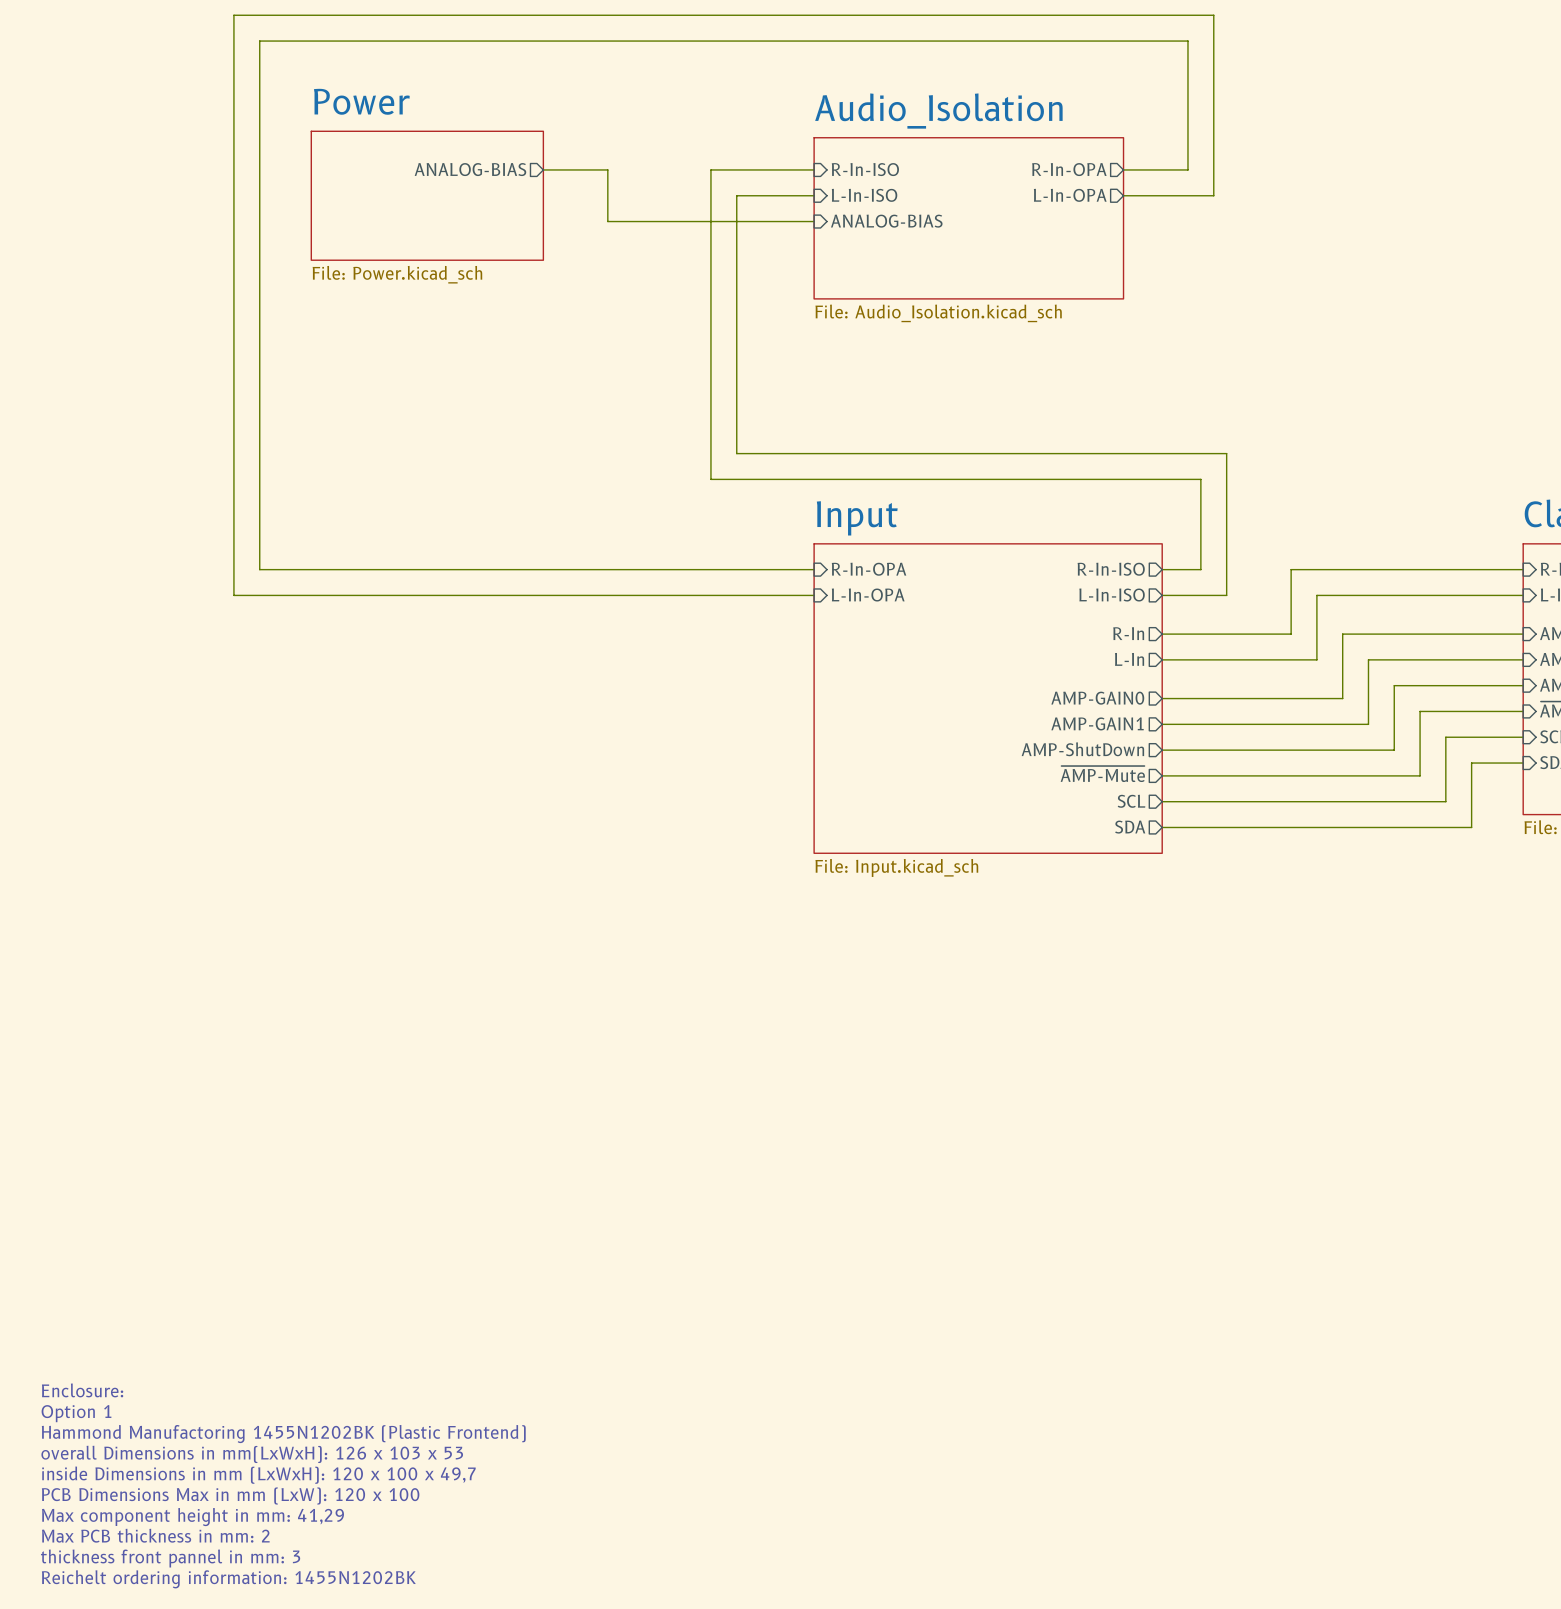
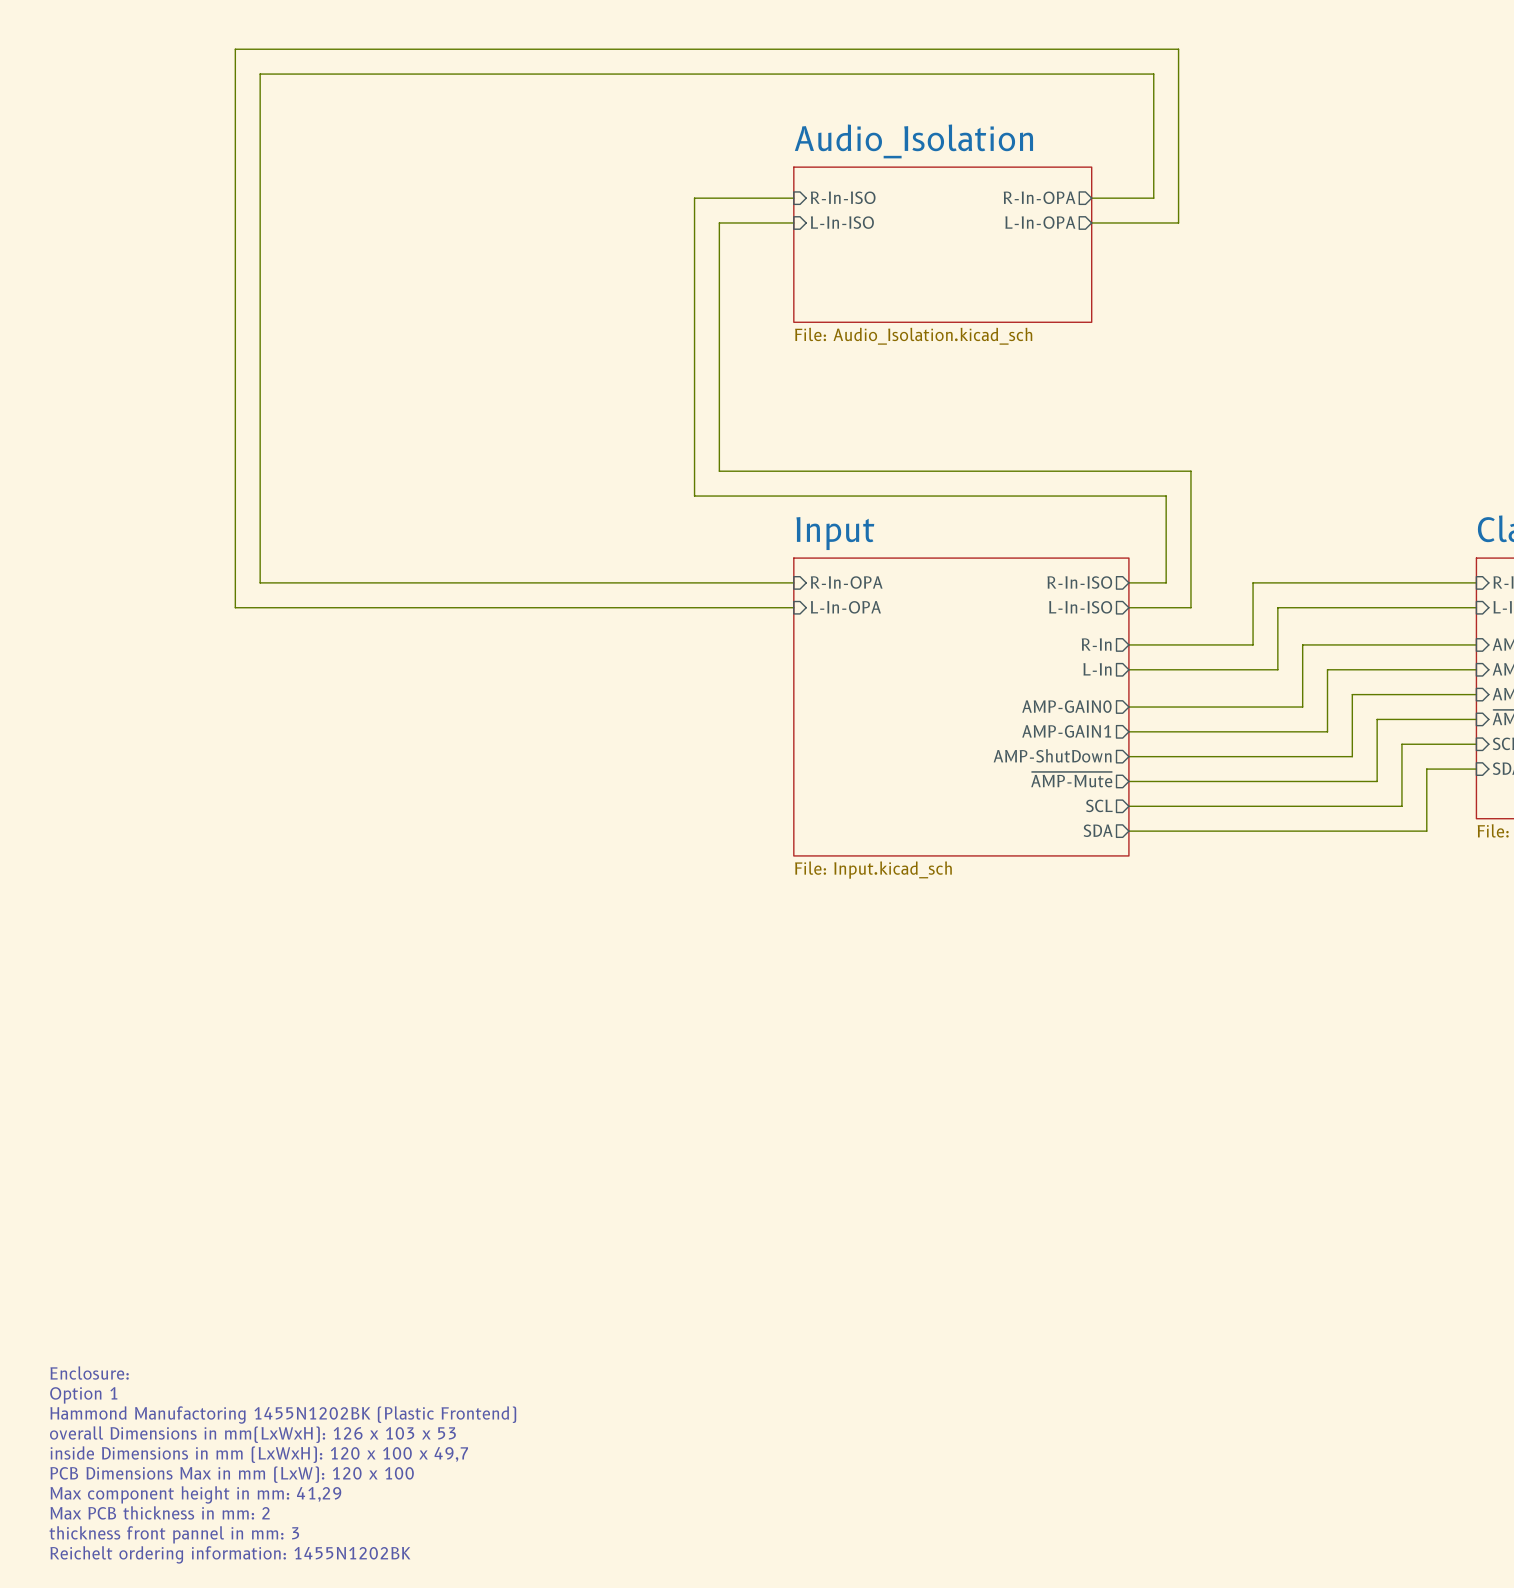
sheet pin: ANALOG-BIAS (470, 169) -> none
wire: (543, 169) (607, 169) (607, 221) (814, 221) -> none
sheet Power: File: Power.kicad_sch (427, 195) -> none
sheet pin: ANALOG-BIAS (886, 221) -> none

